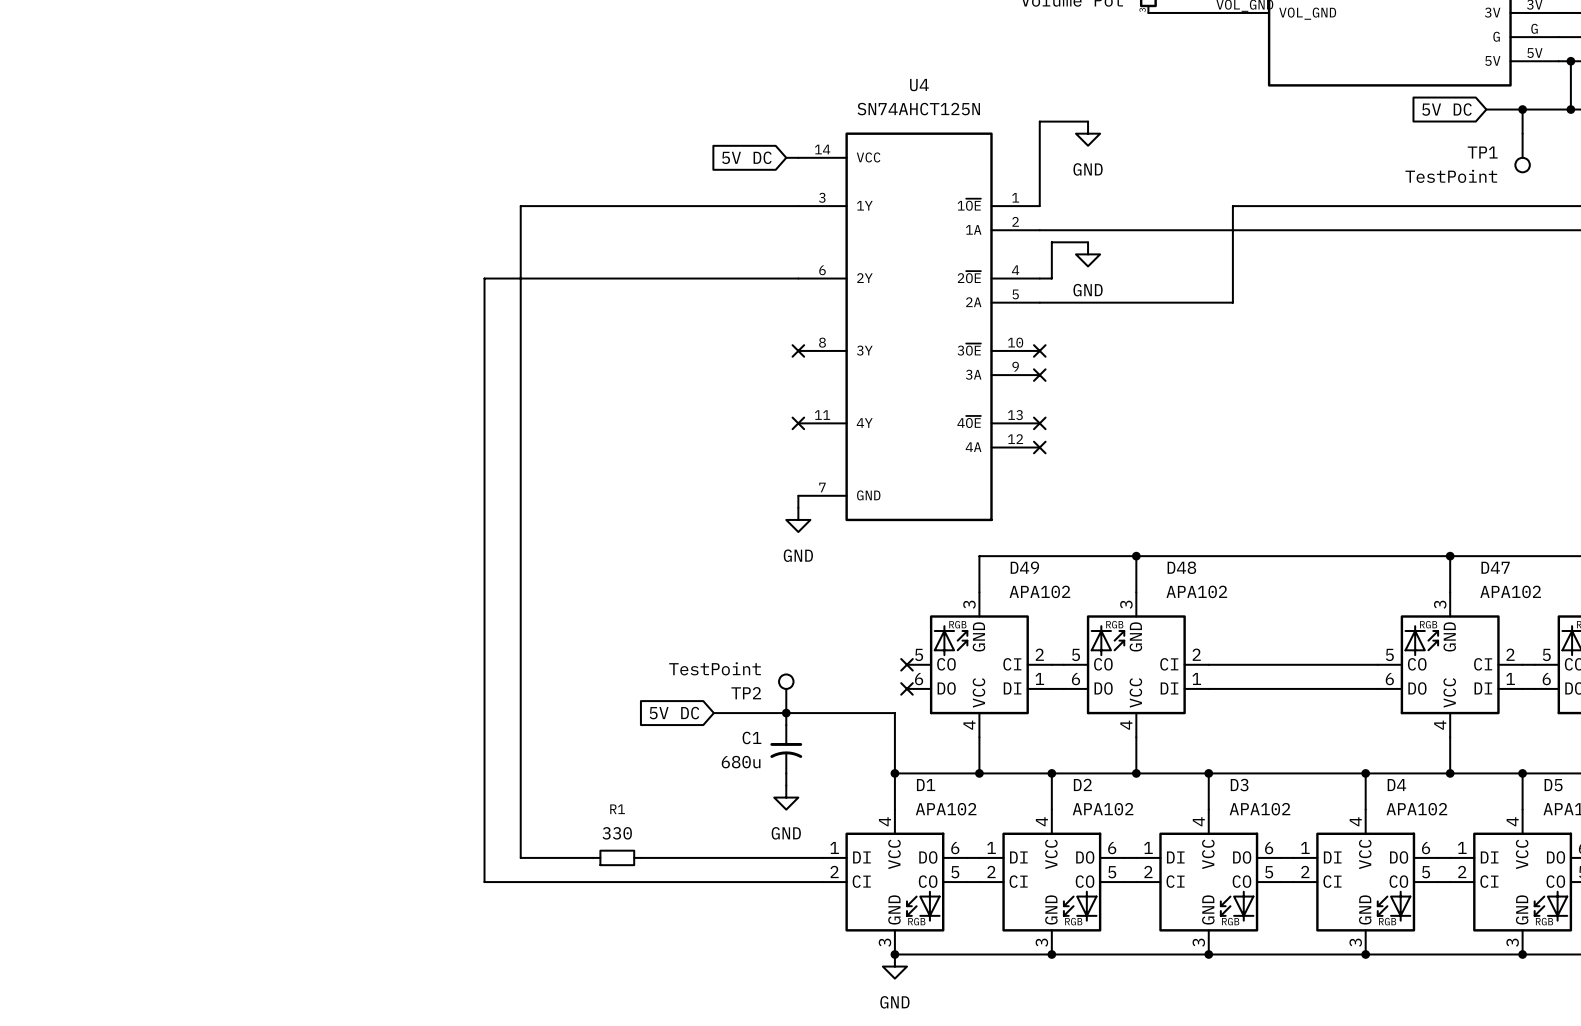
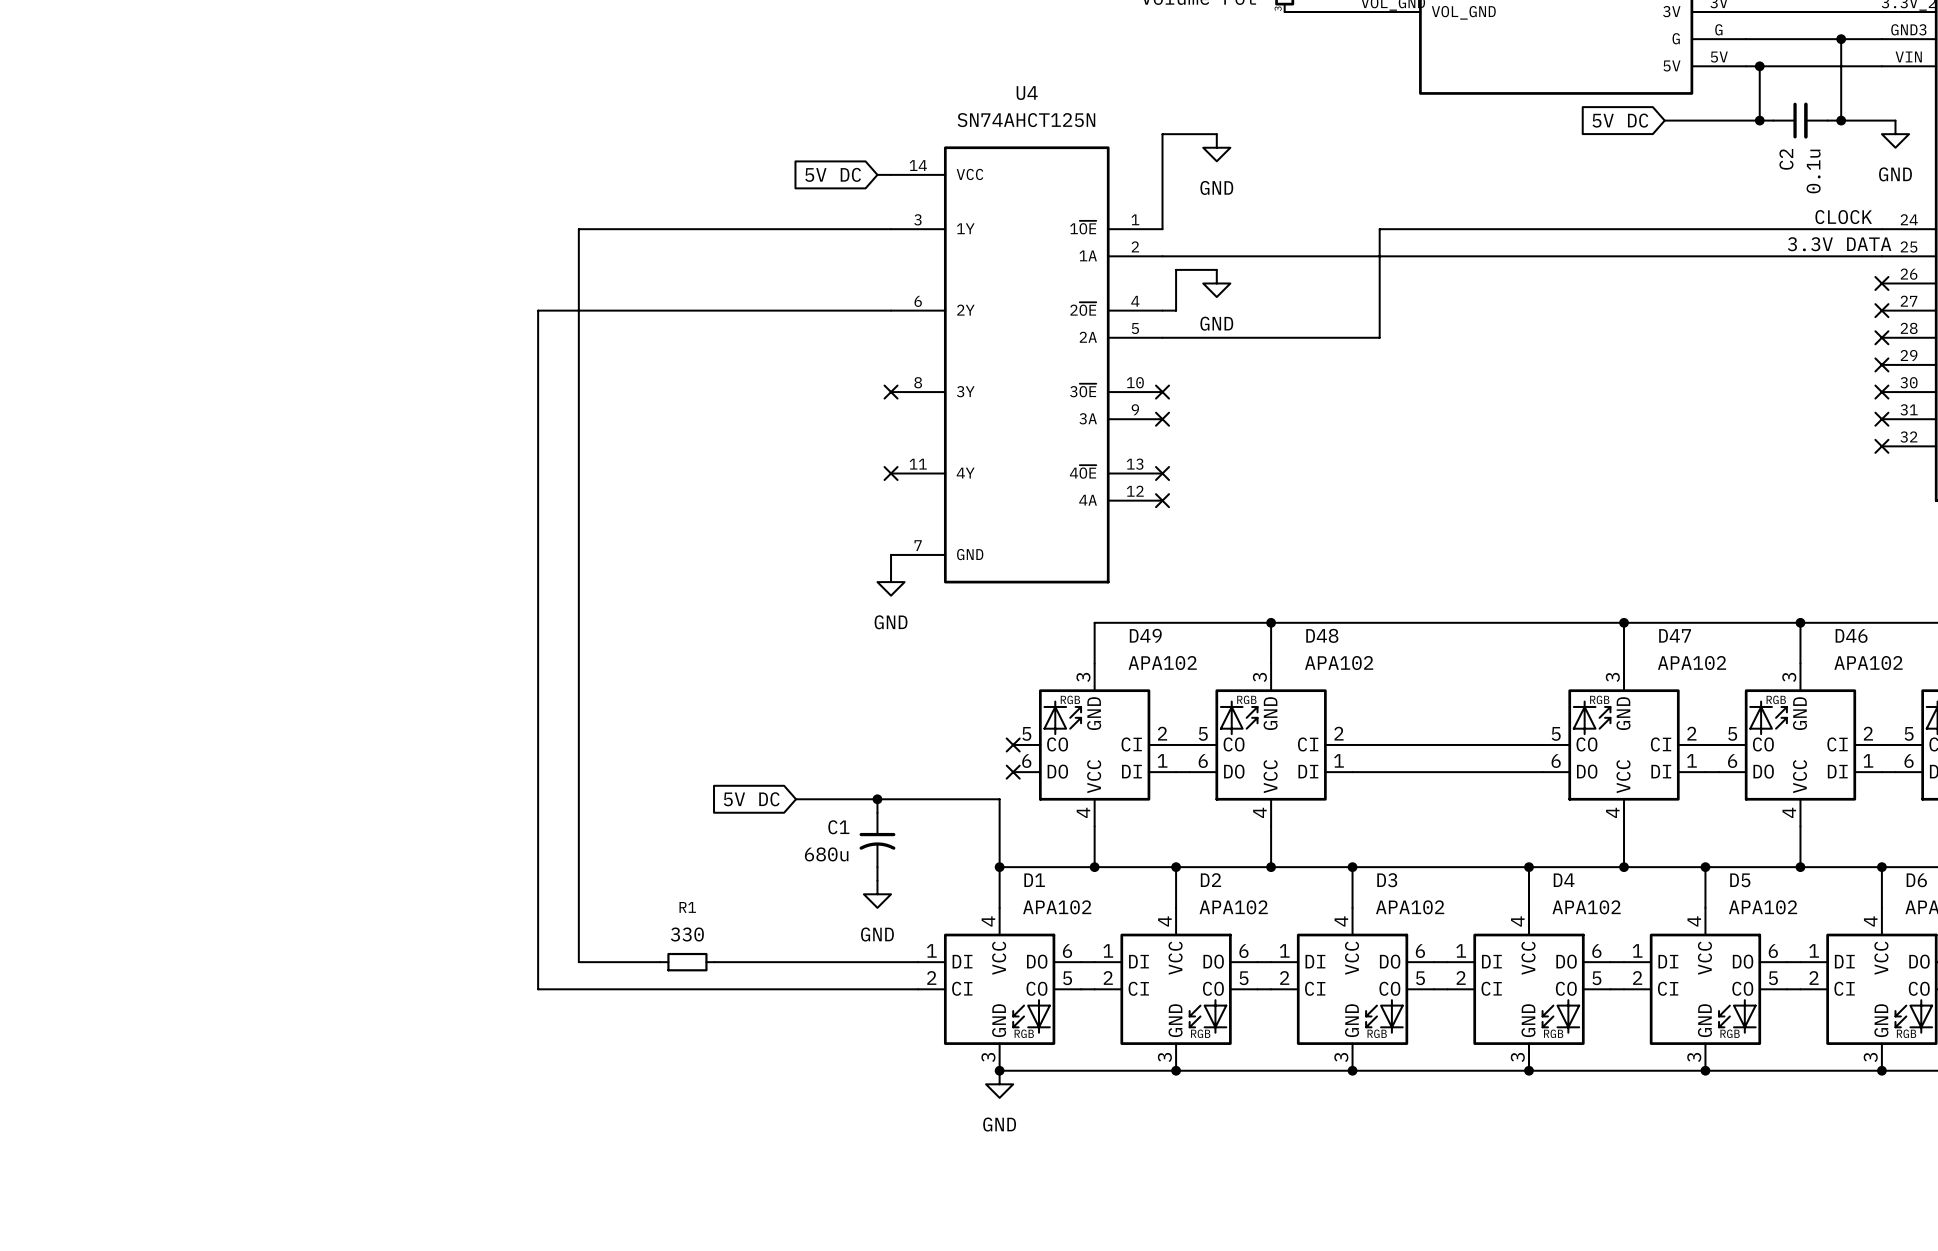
wire: (1522, 109) (1522, 133) -> none
junction: (1522, 109) -> none
TP1: TestPoint (1522, 152) -> none
TP2: TestPoint (786, 693) -> none

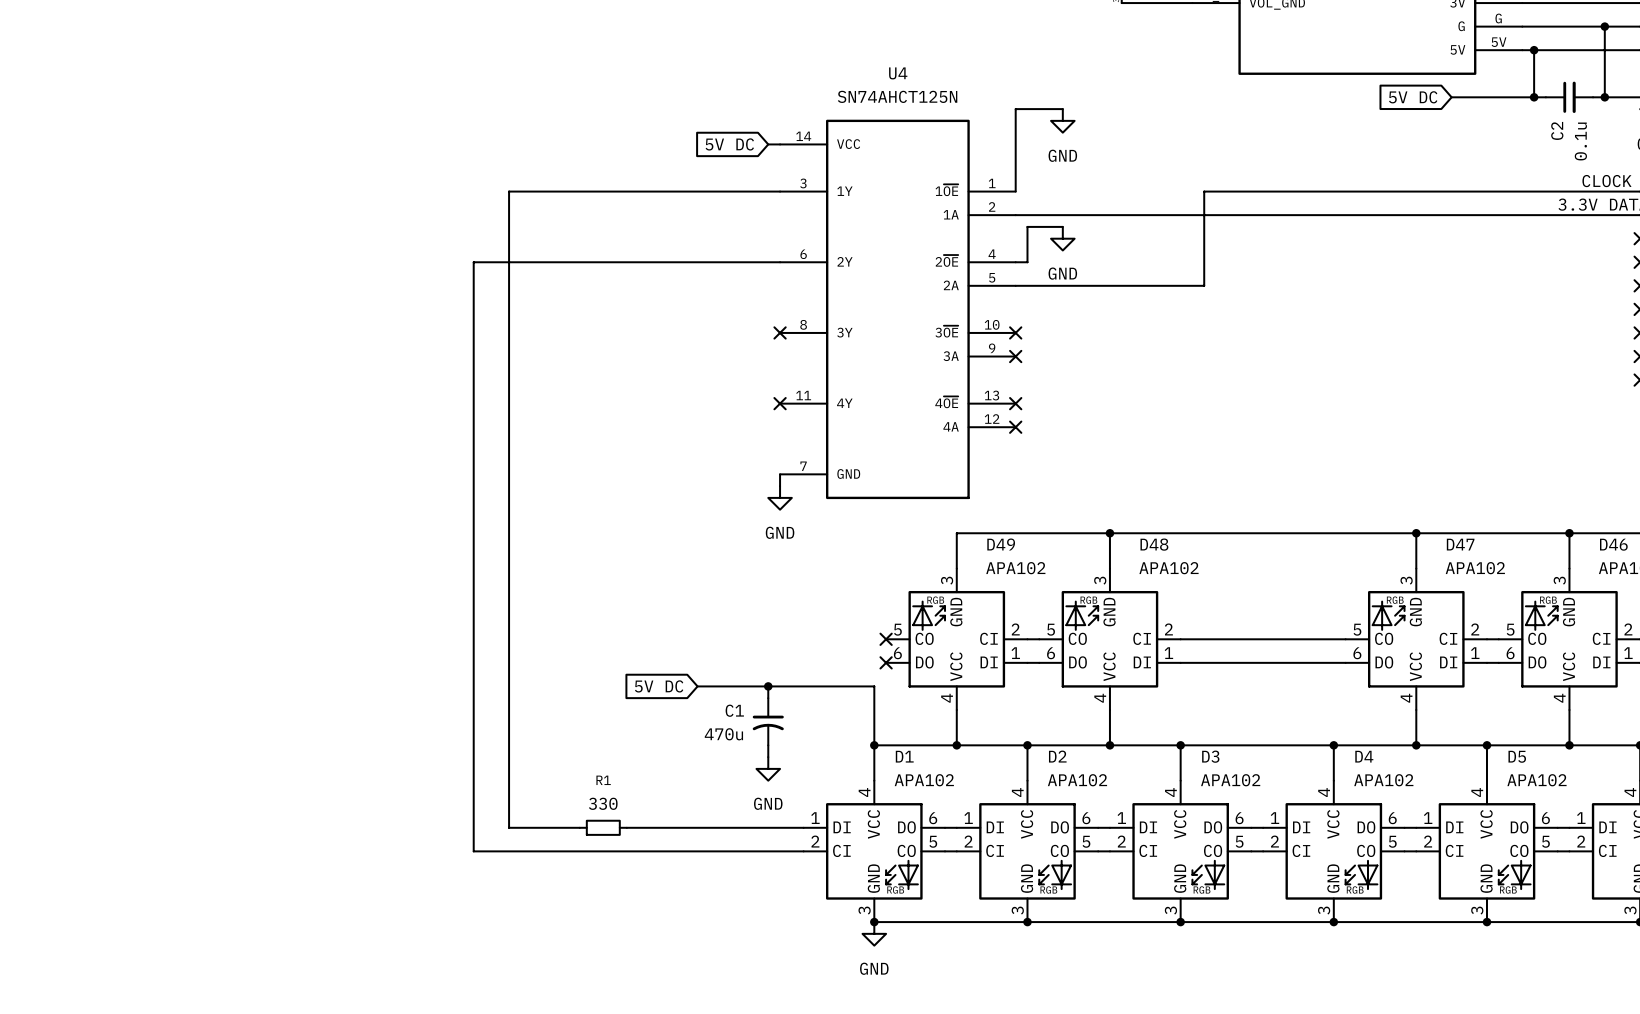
C1 value: 680u (826, 854) -> 470u (723, 734)

